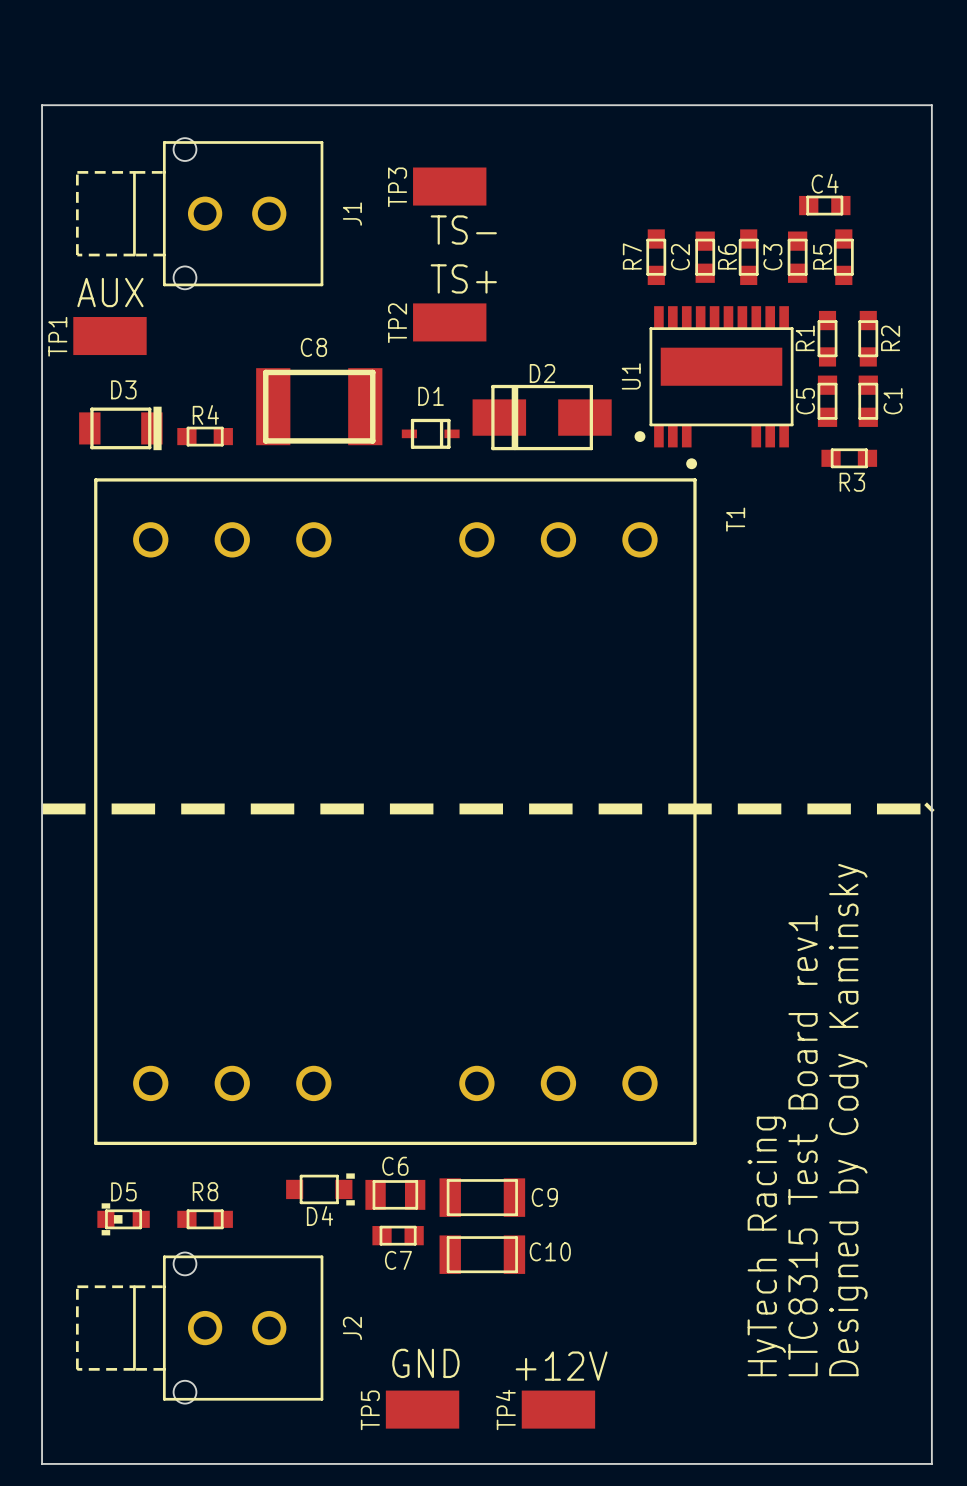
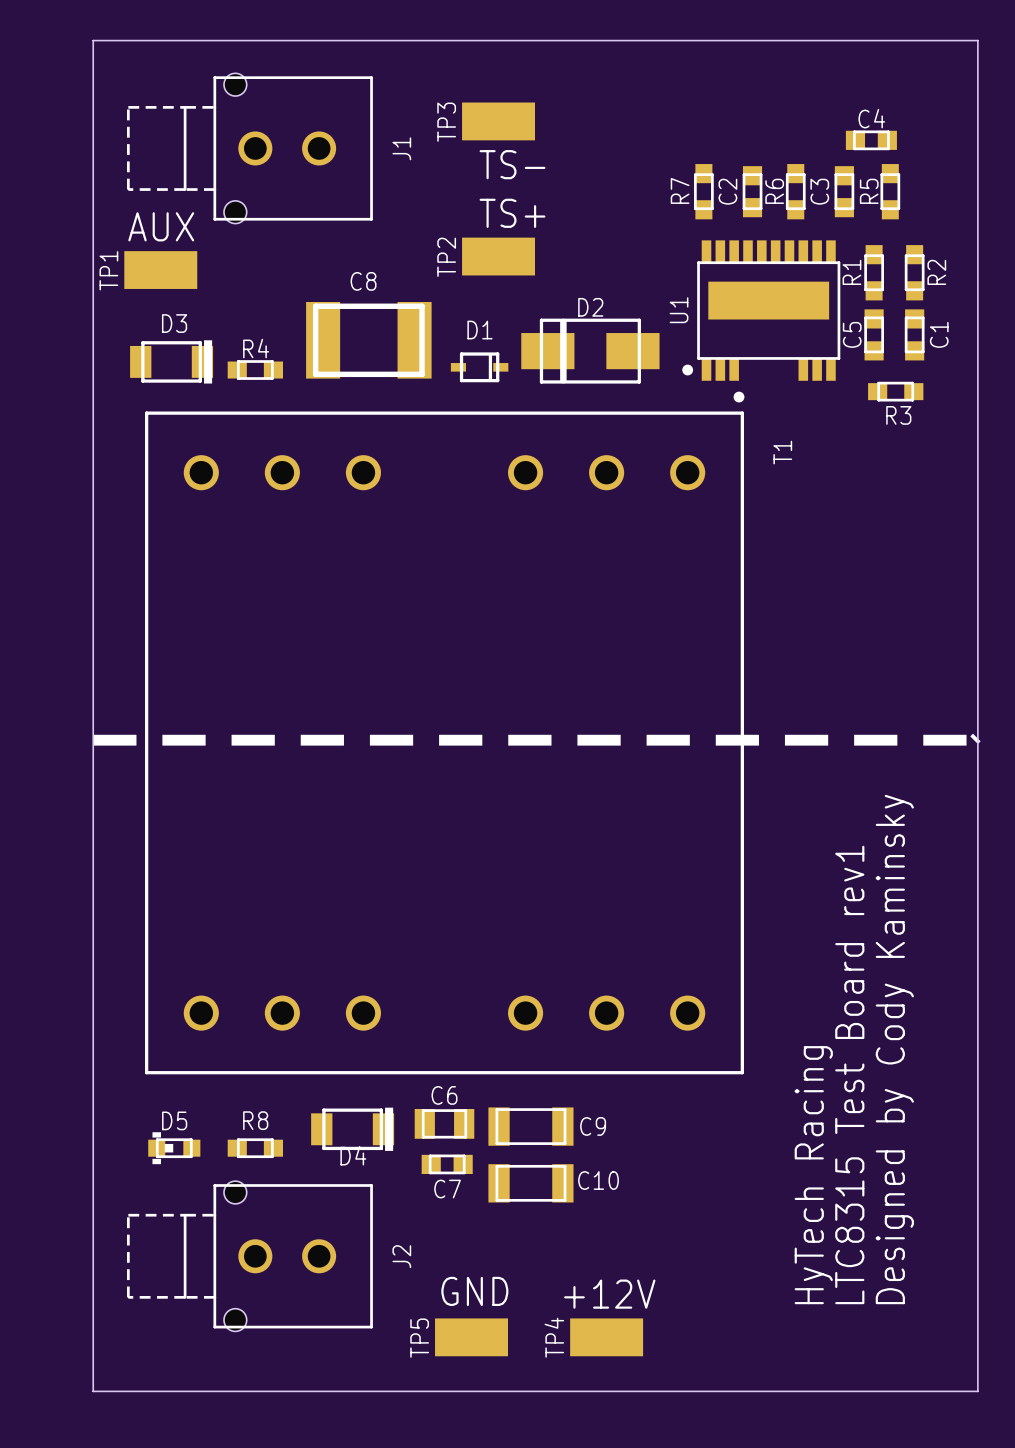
D4 footprint: [286, 1173, 355, 1206] -> [311, 1107, 395, 1151]

